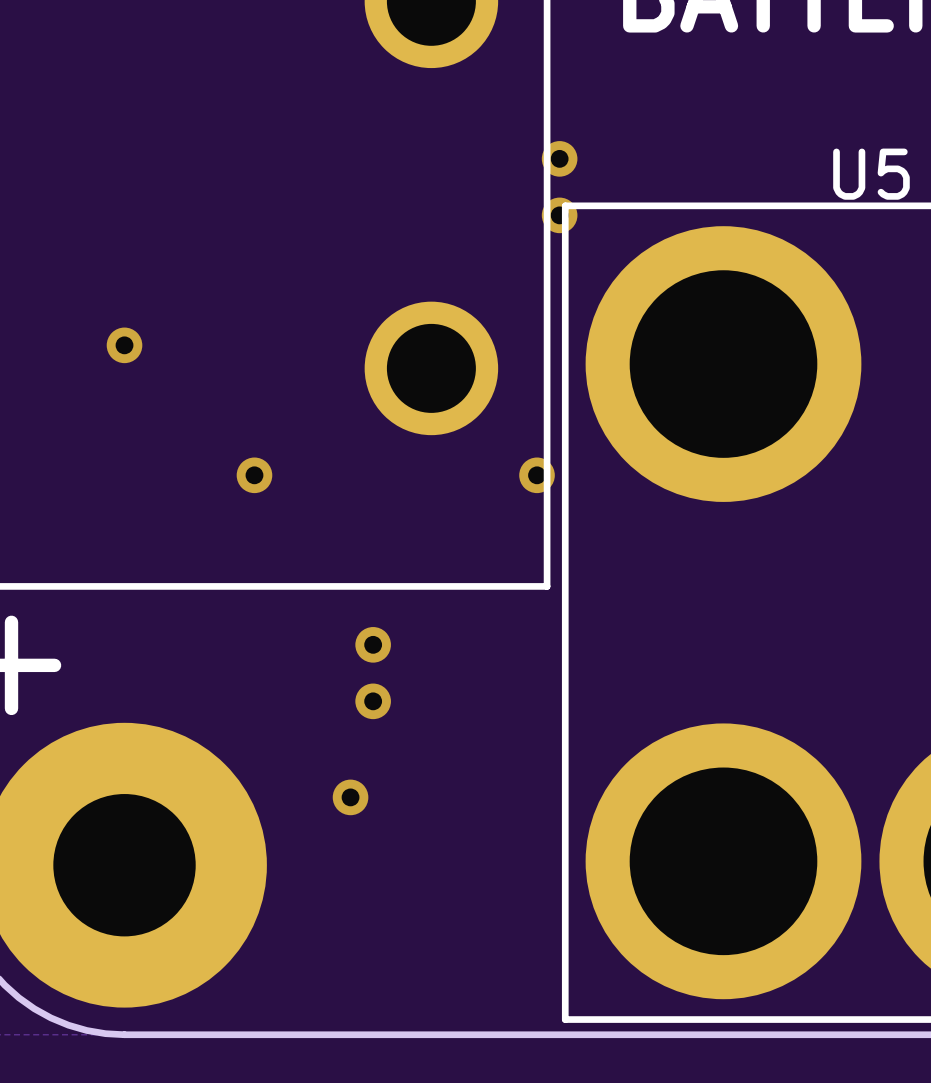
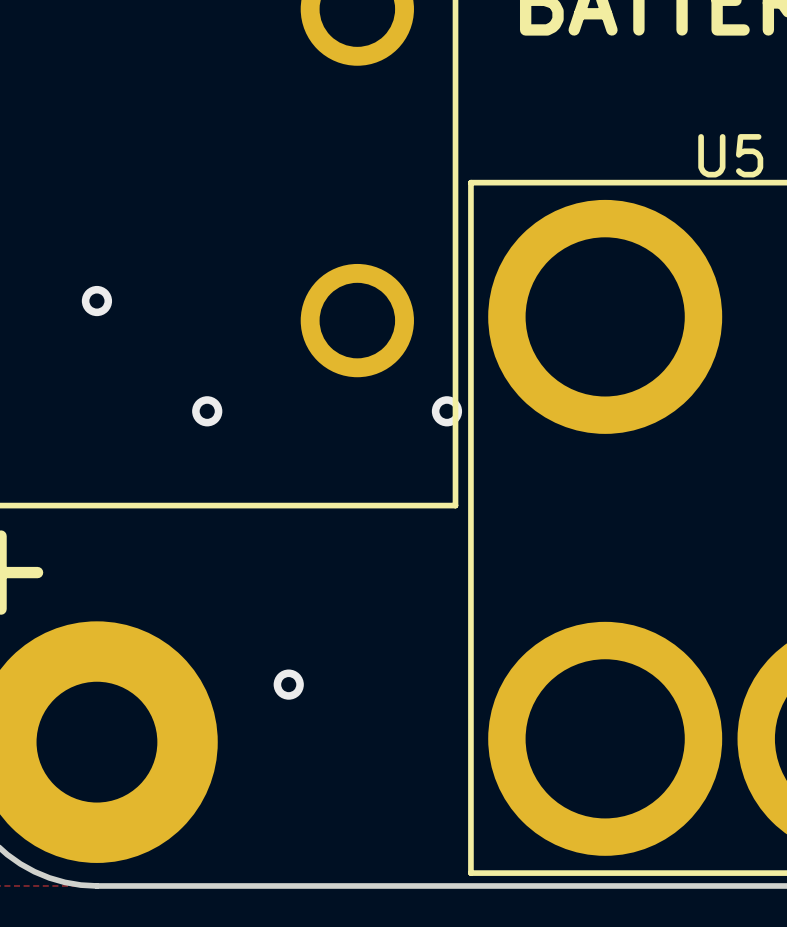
via: (559, 158) -> none
via: (559, 215) -> none
via: (373, 644) -> none
via: (373, 701) -> none

